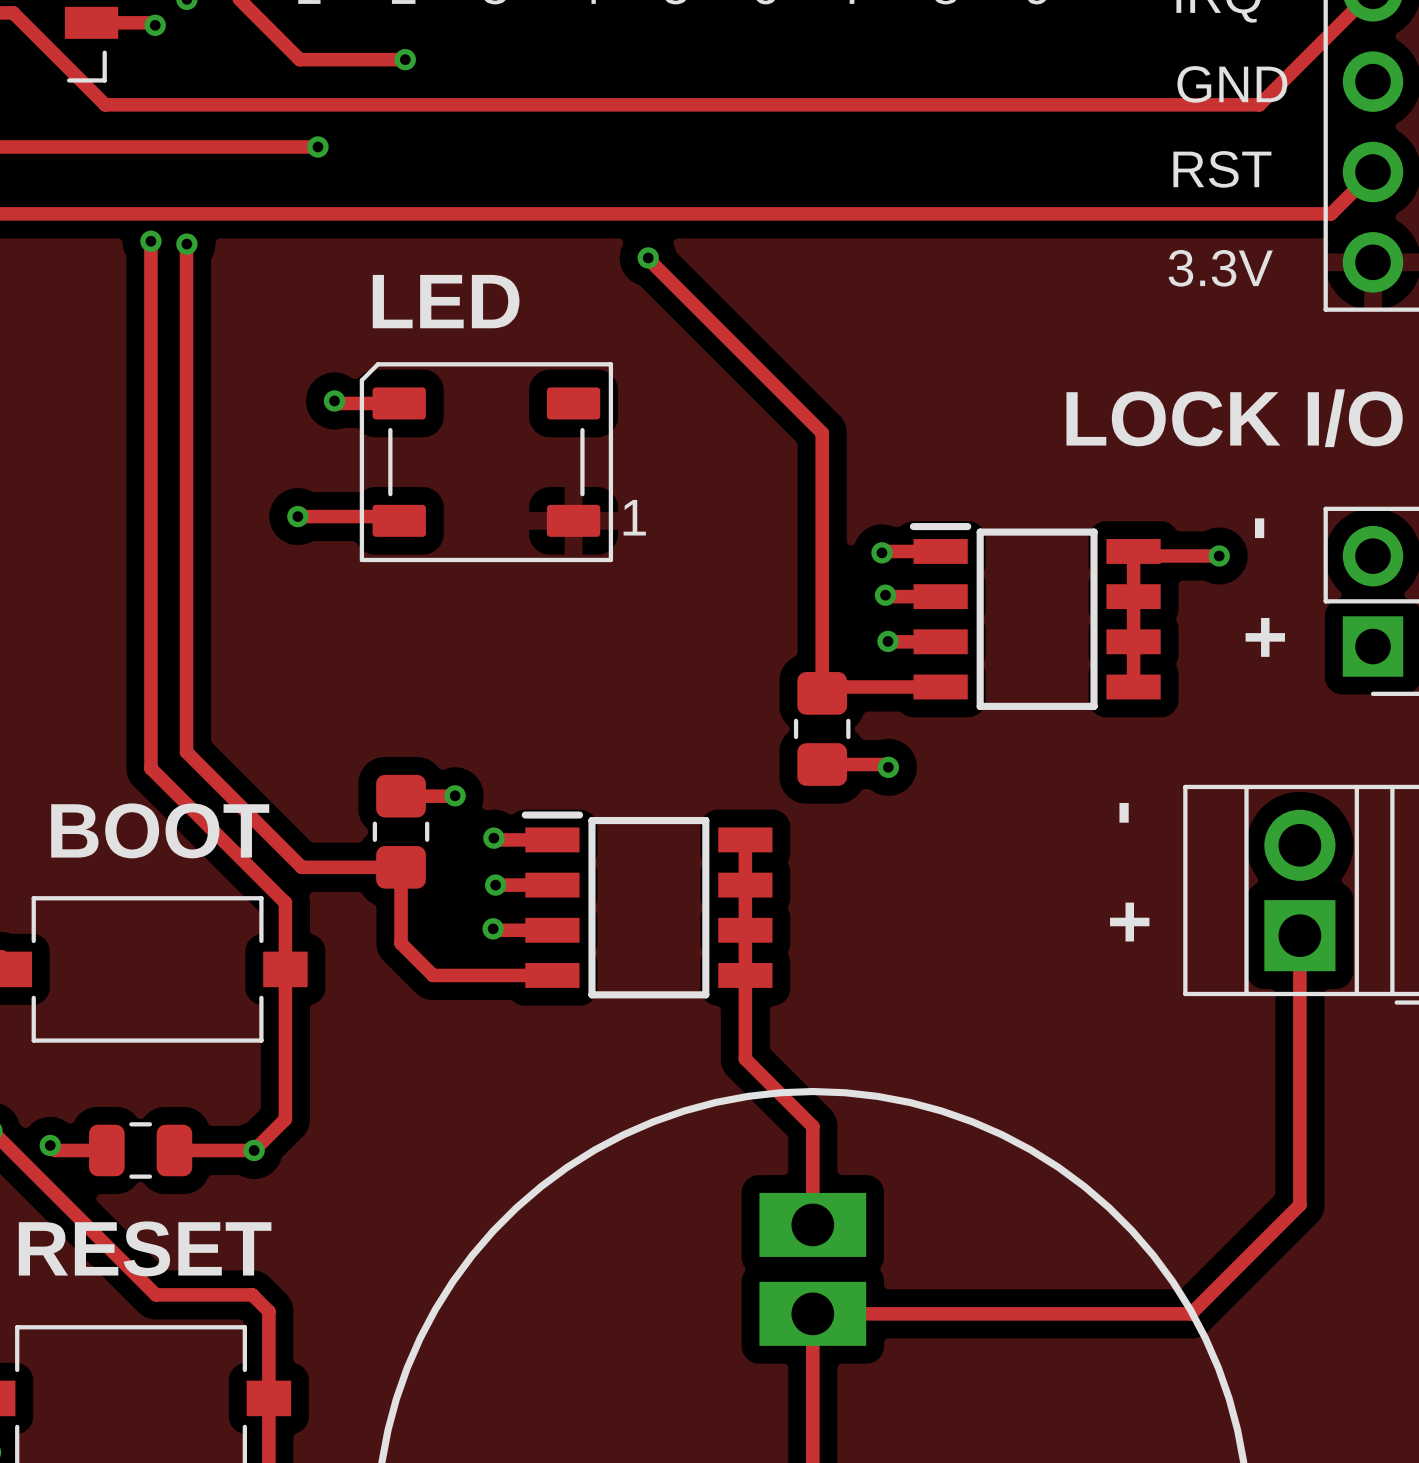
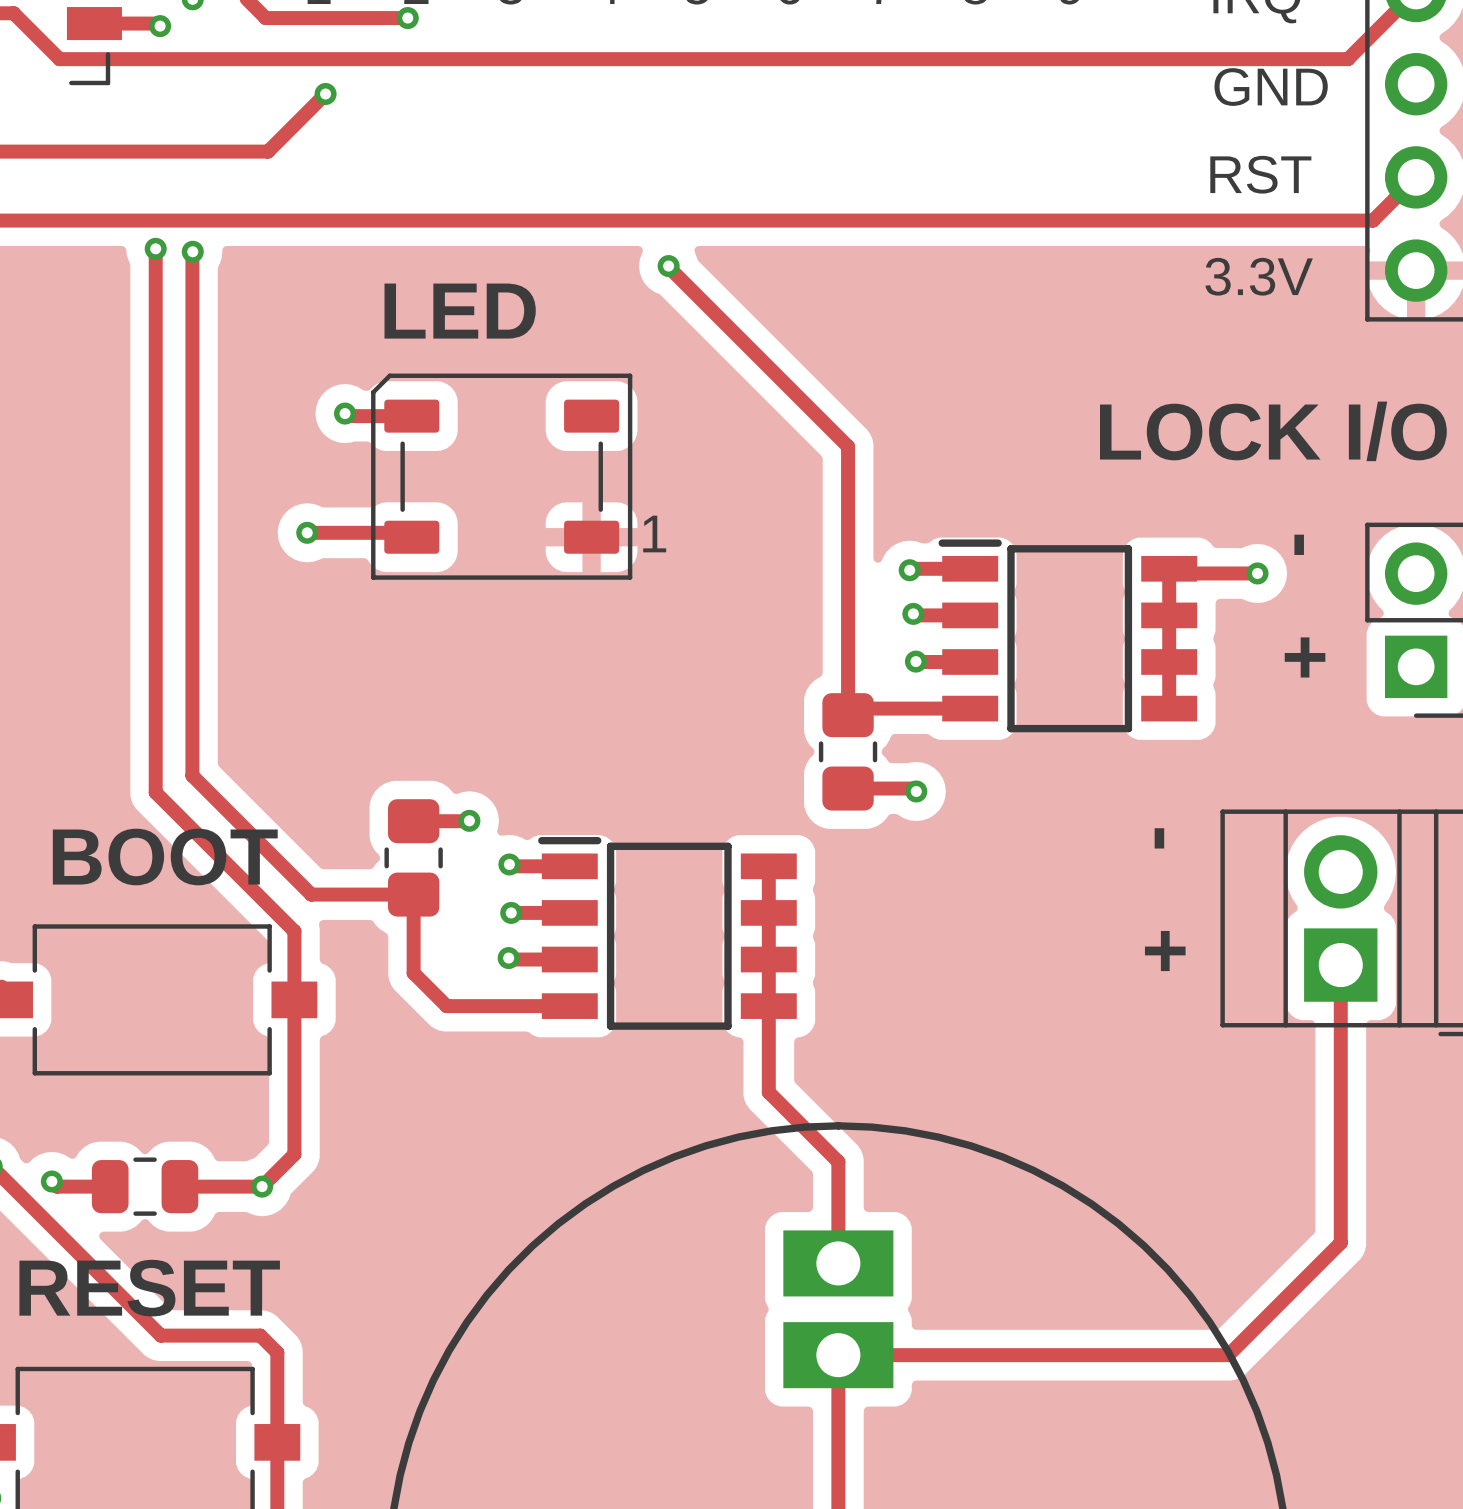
track: (257, 17) (299, 59) (405, 59) -> (265, 18) (407, 18)
track: (57, 57) (105, 104) (1259, 104) (1306, 57) -> (59, 59) (1348, 59)
via position: (405, 59) -> (407, 18)
via: none -> (325, 93)
track: (259, 146) (317, 146) -> (267, 151) (325, 93)
via: (317, 146) -> none

